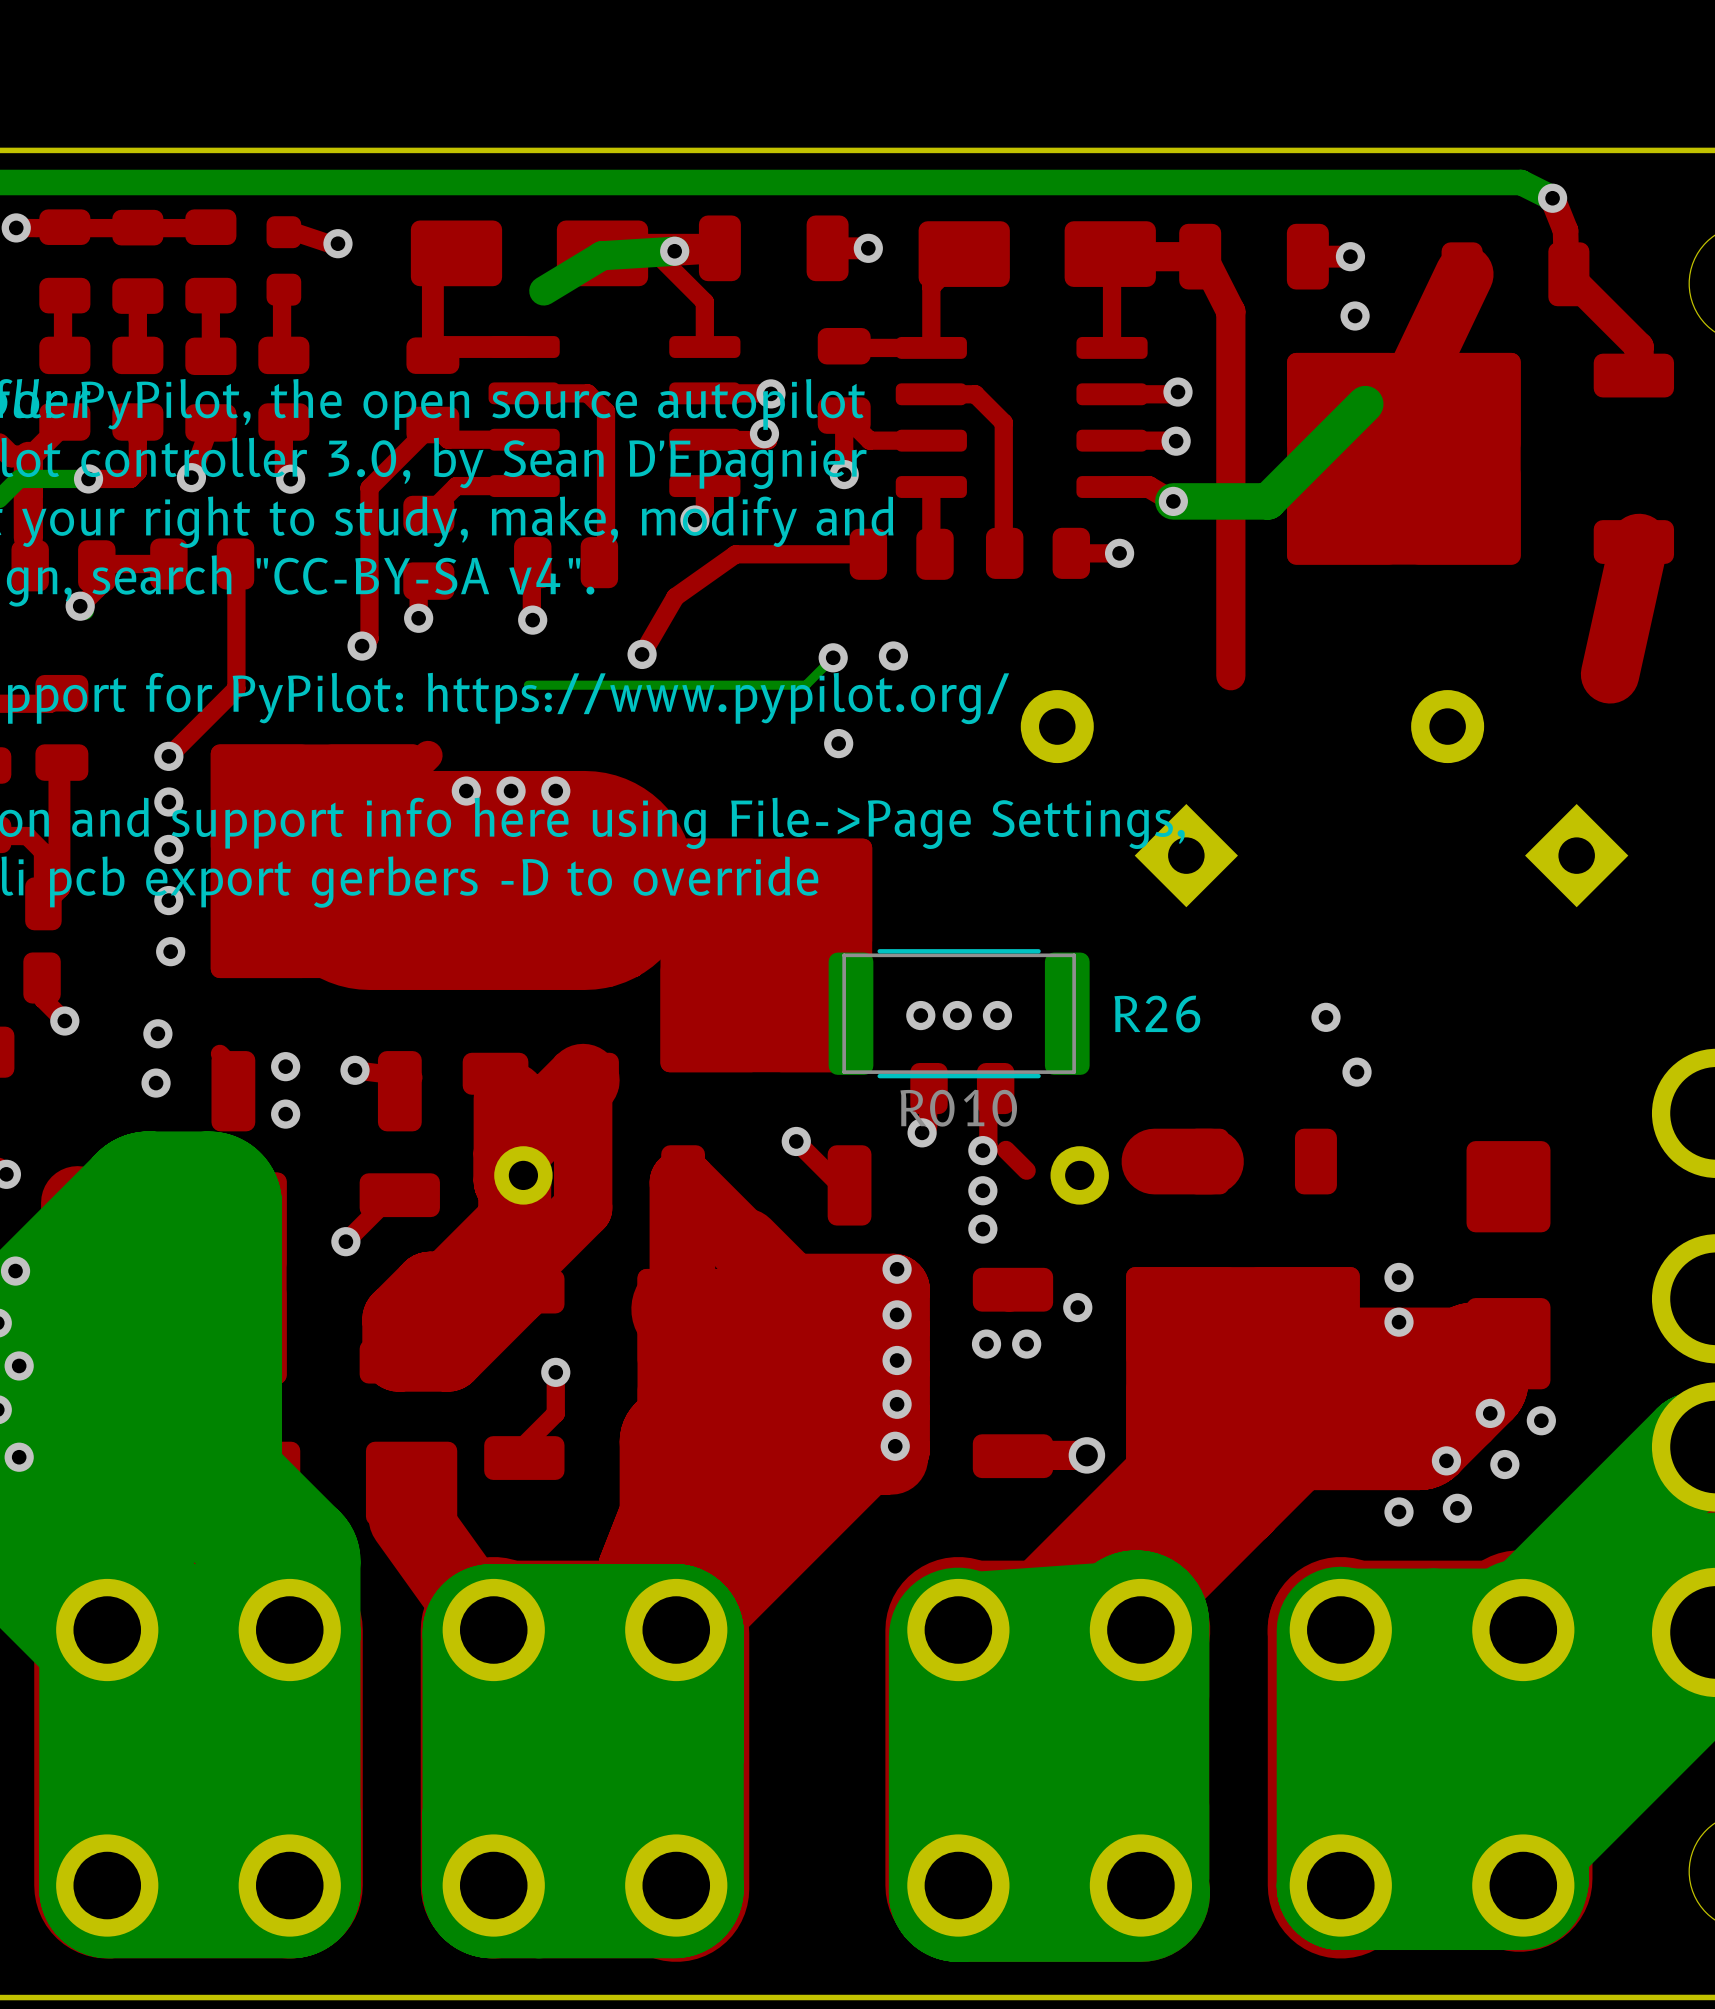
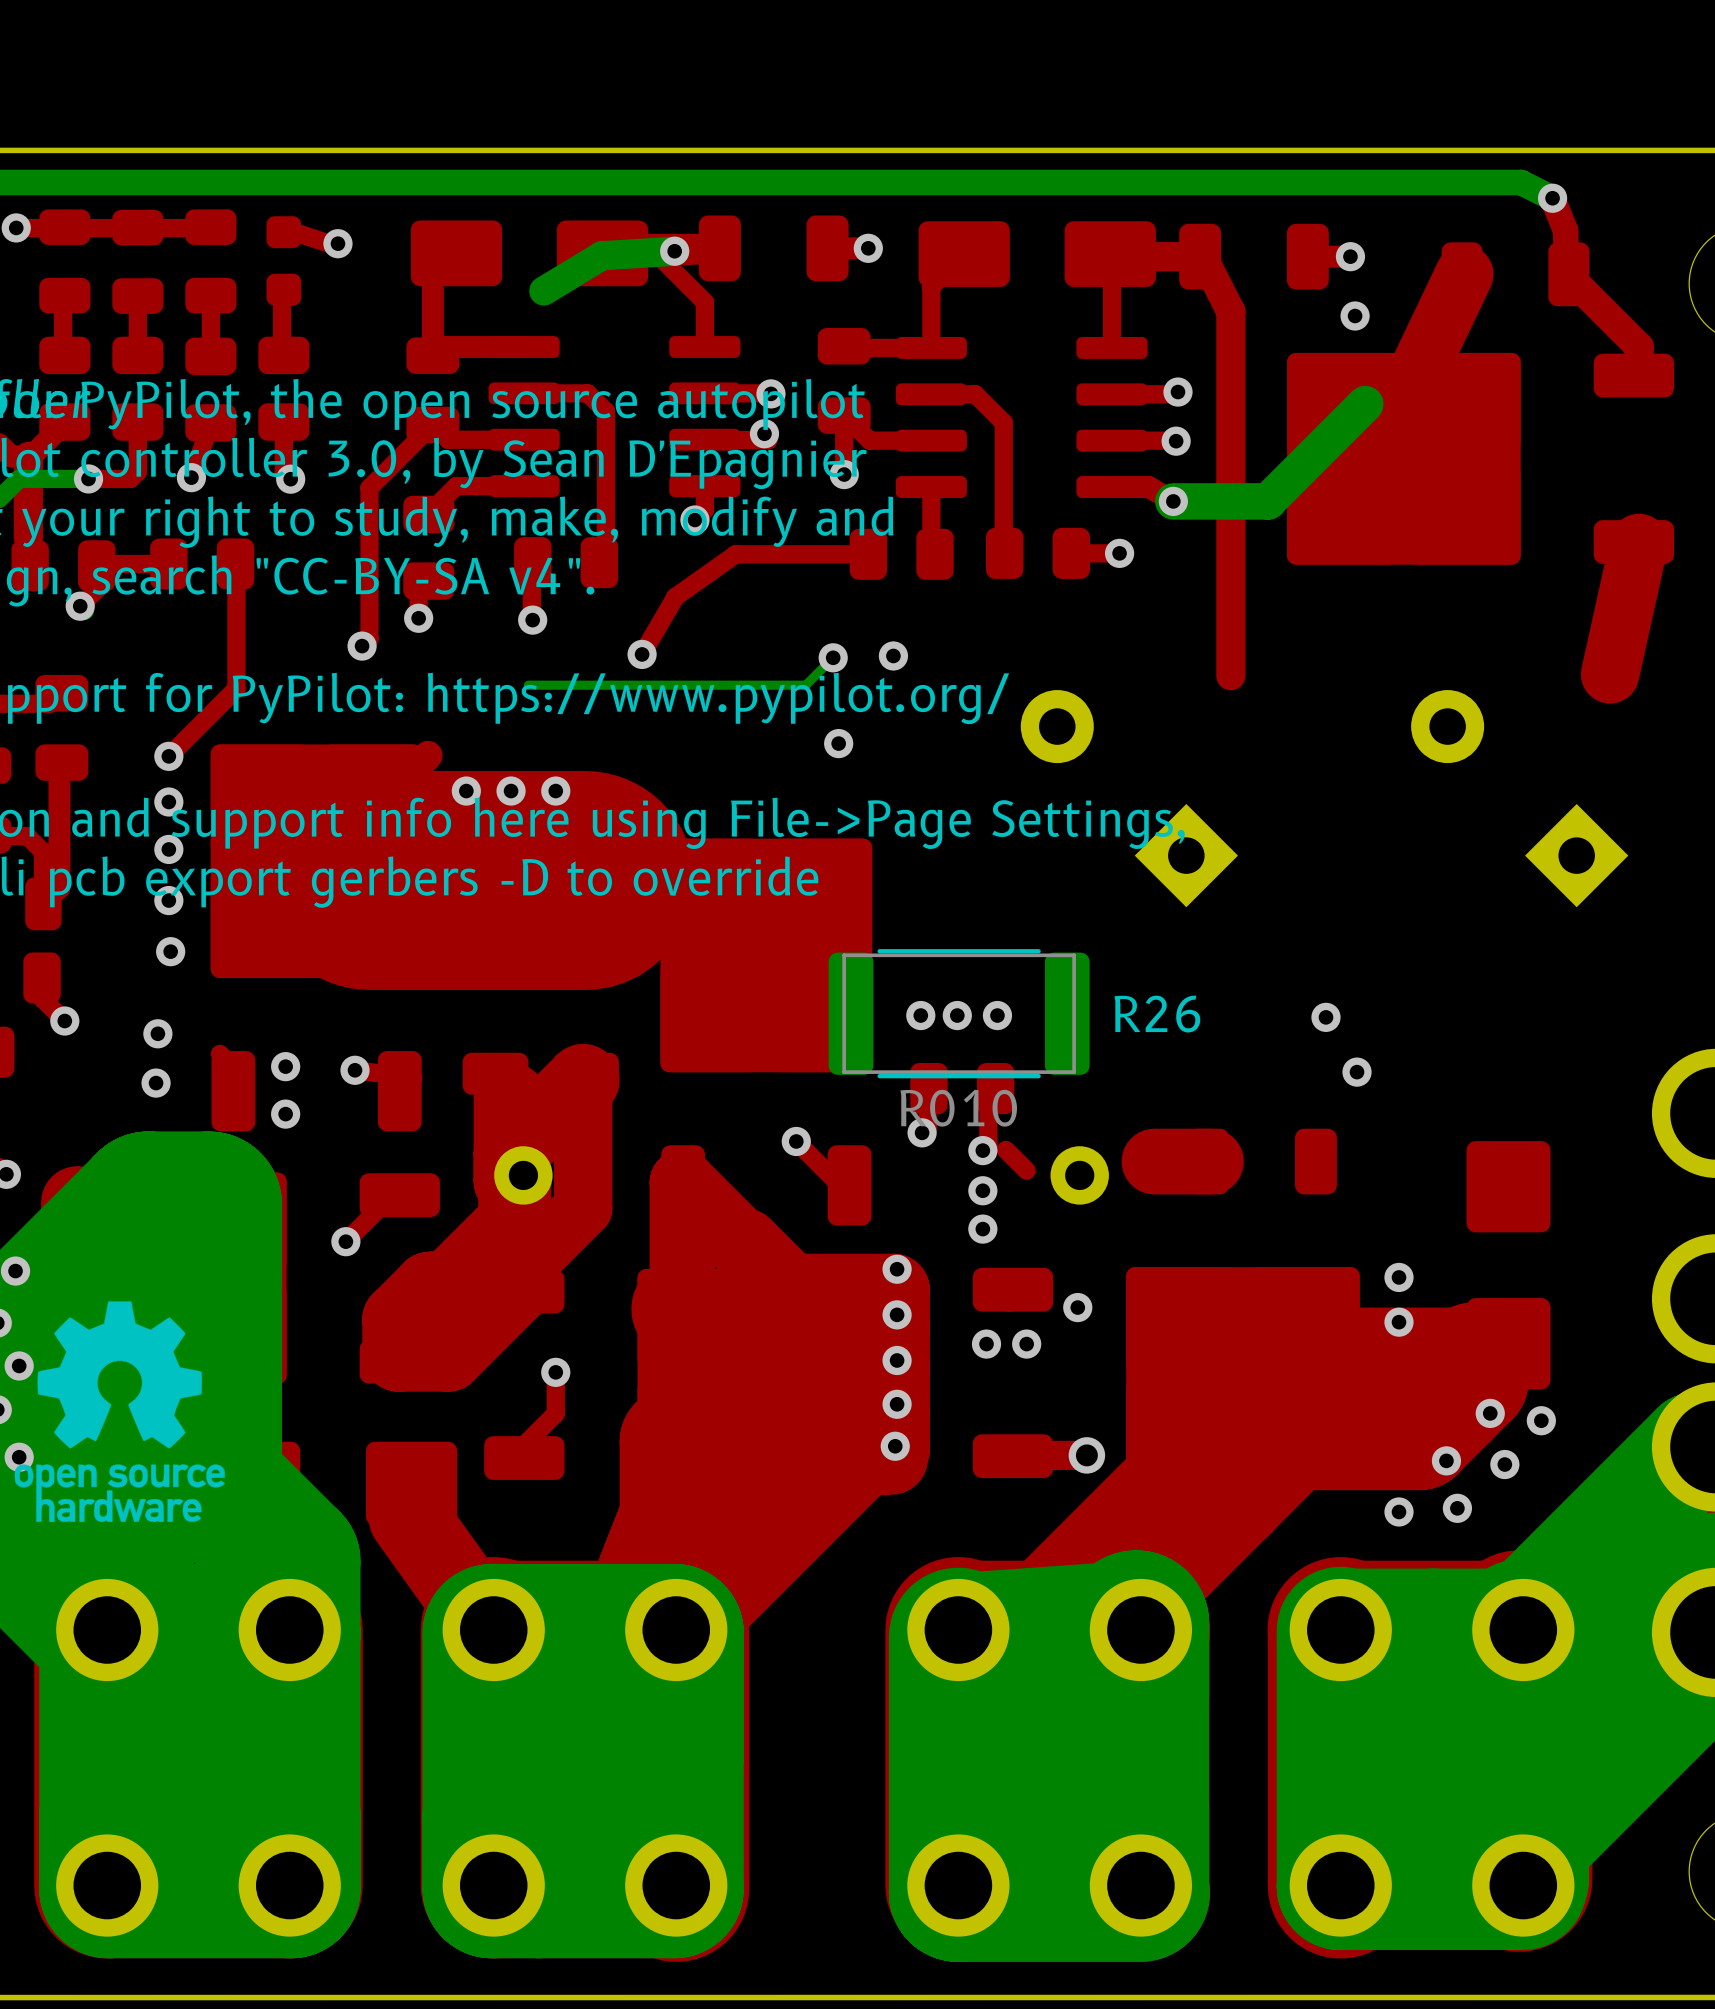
drawing: none -> [14, 1301, 225, 1522]

